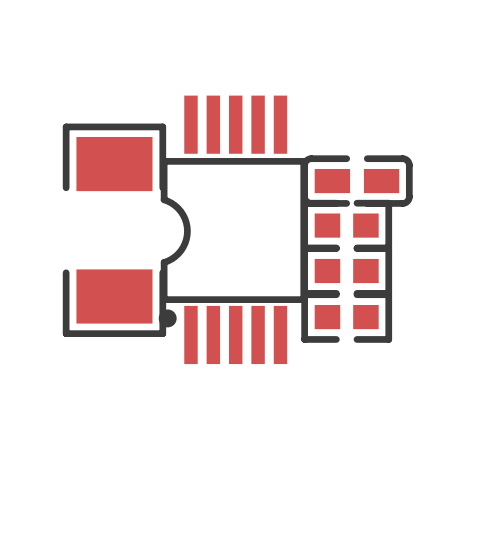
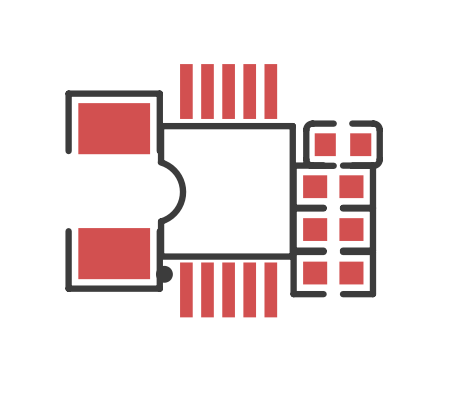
part footprint: [301, 155, 413, 207] -> [303, 120, 383, 169]

